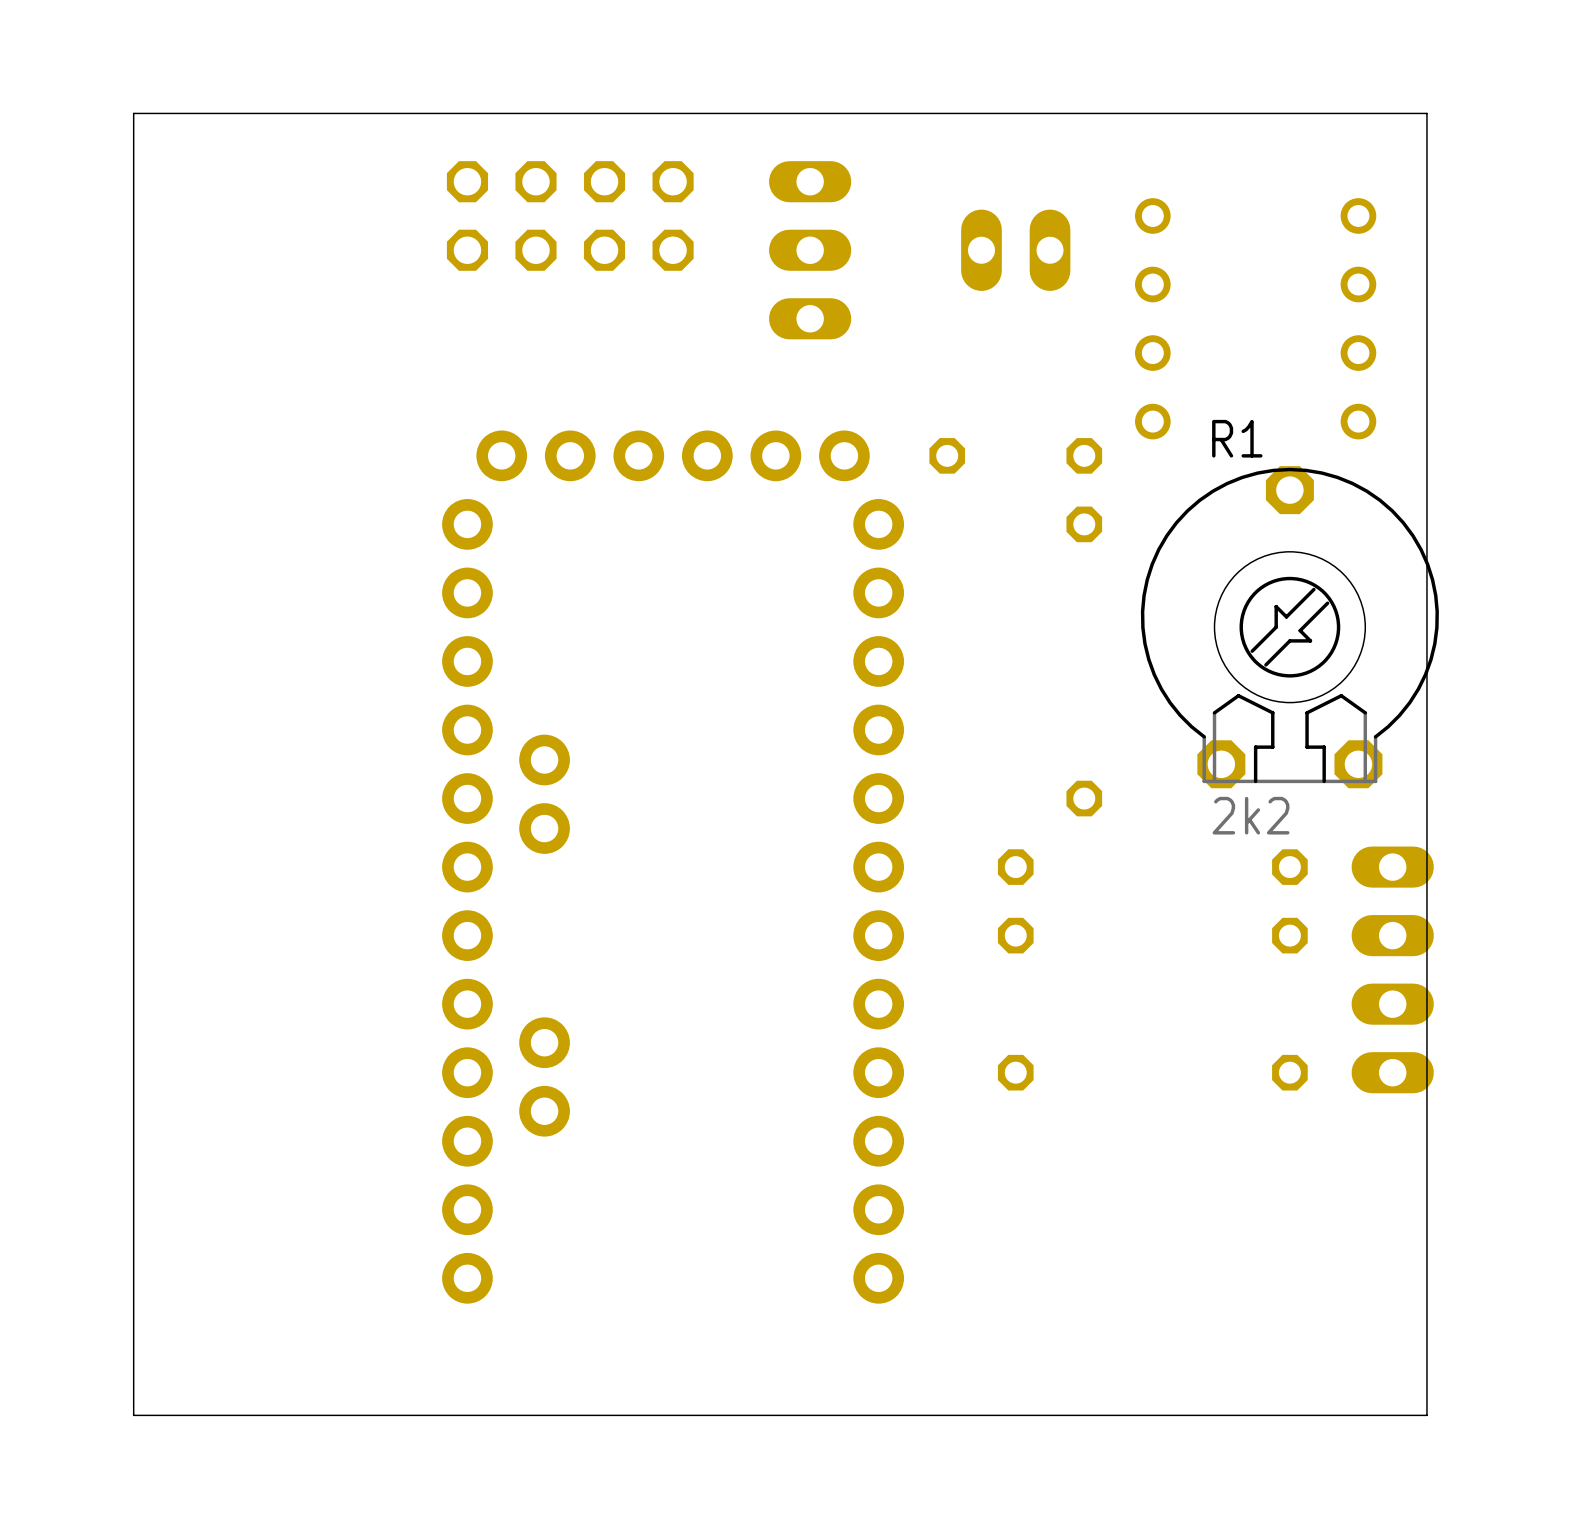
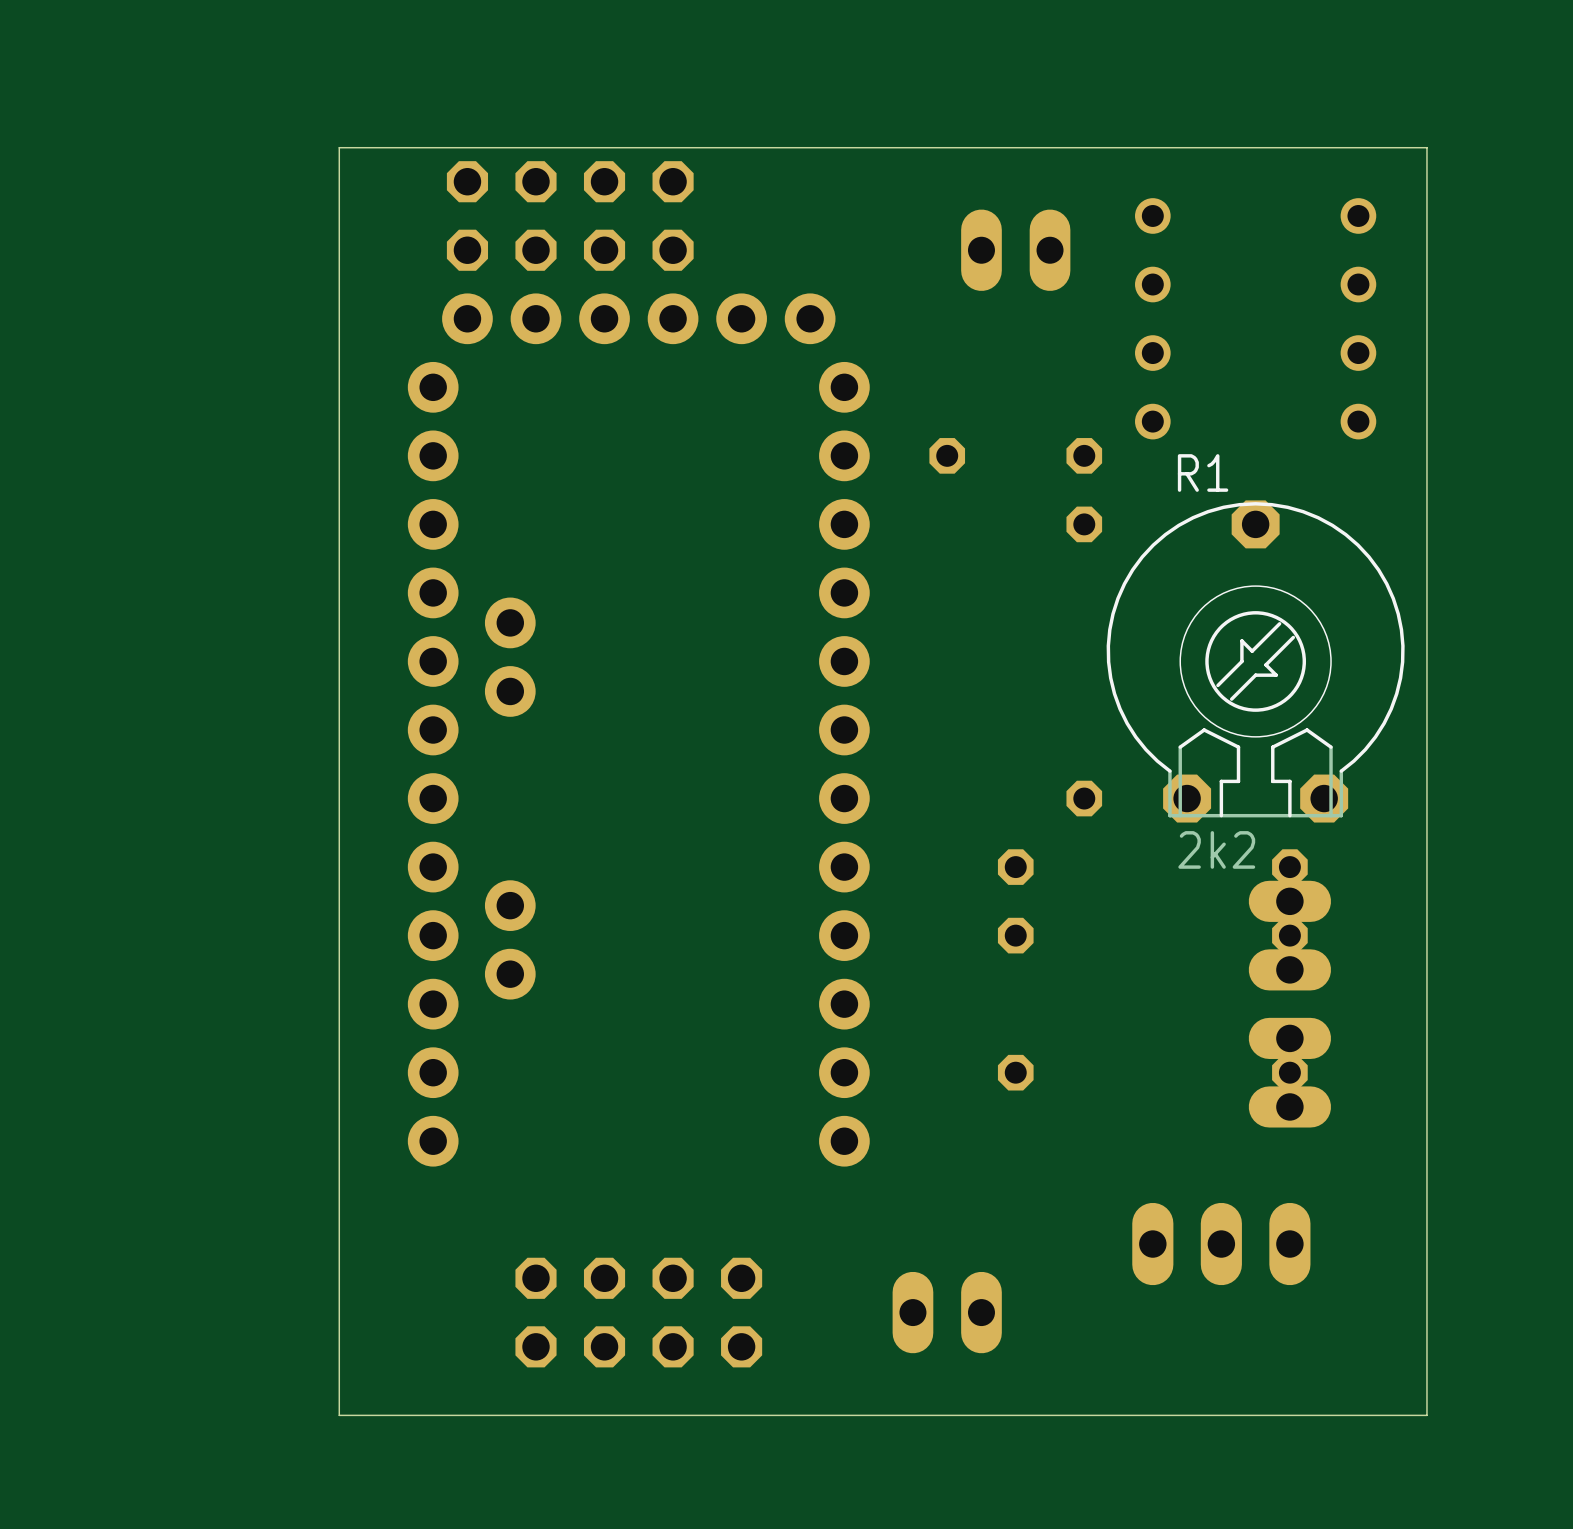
board edge: (1426, 147) (1426, 113) (133, 113) (133, 1415) (339, 1415) -> (1426, 147) (339, 147) (339, 1415)
part: (810, 250) -> none
R1 position: (1289, 627) -> (1255, 661)
part position: (673, 867) -> (638, 730)
part position: (1392, 969) -> (1289, 1004)
part: none -> (1221, 1244)
part: none -> (638, 1312)
part: none -> (947, 1312)

